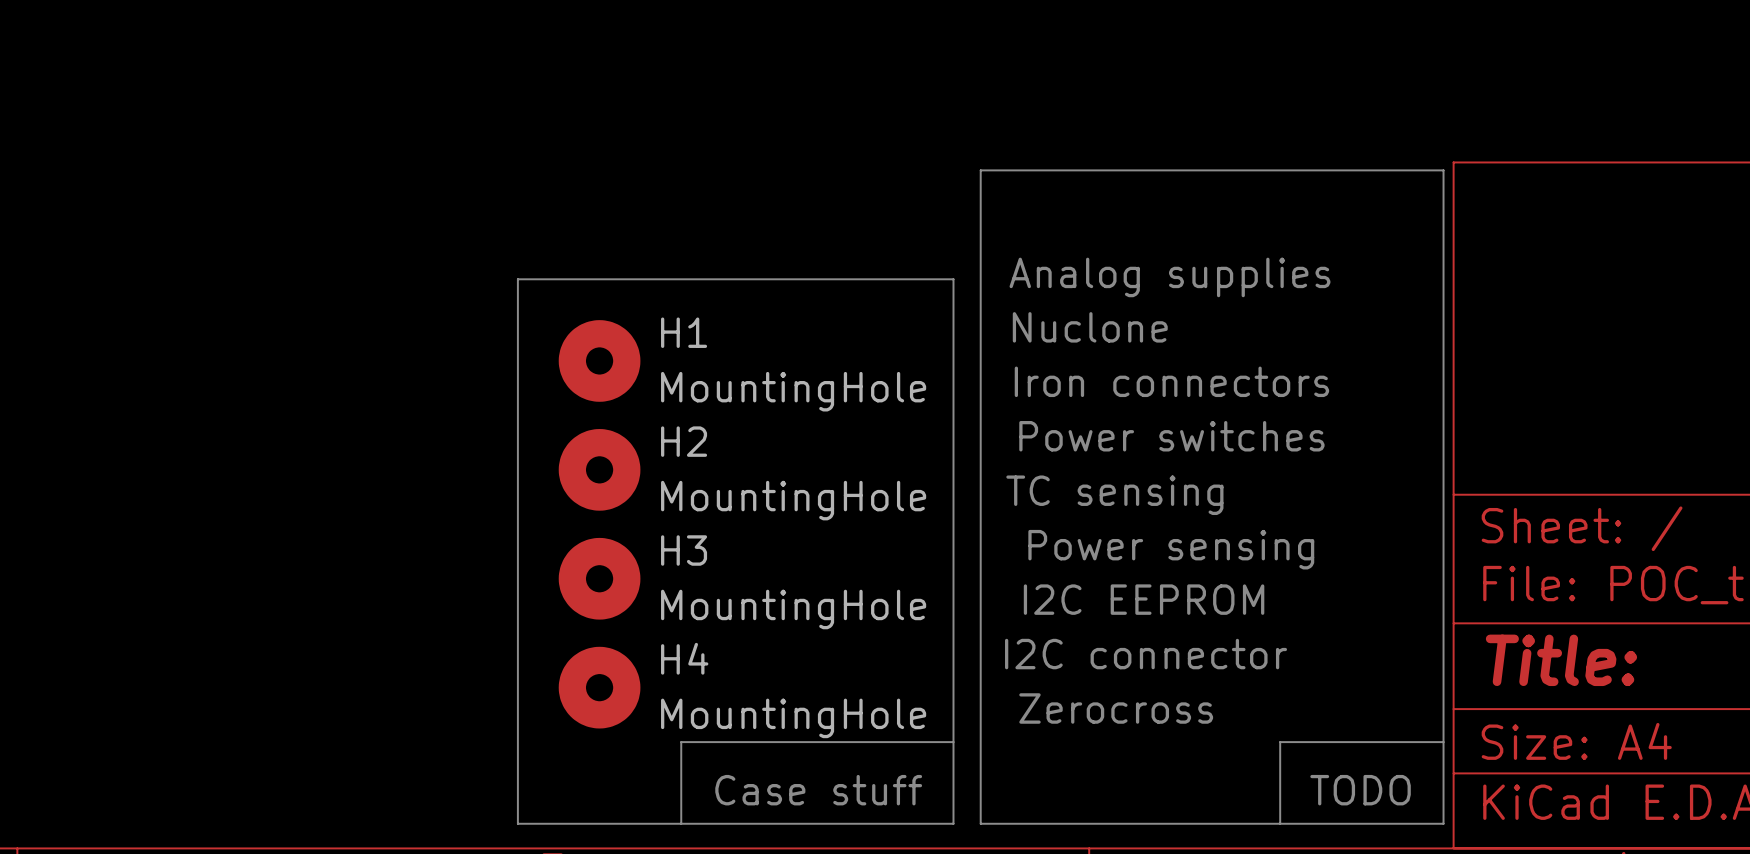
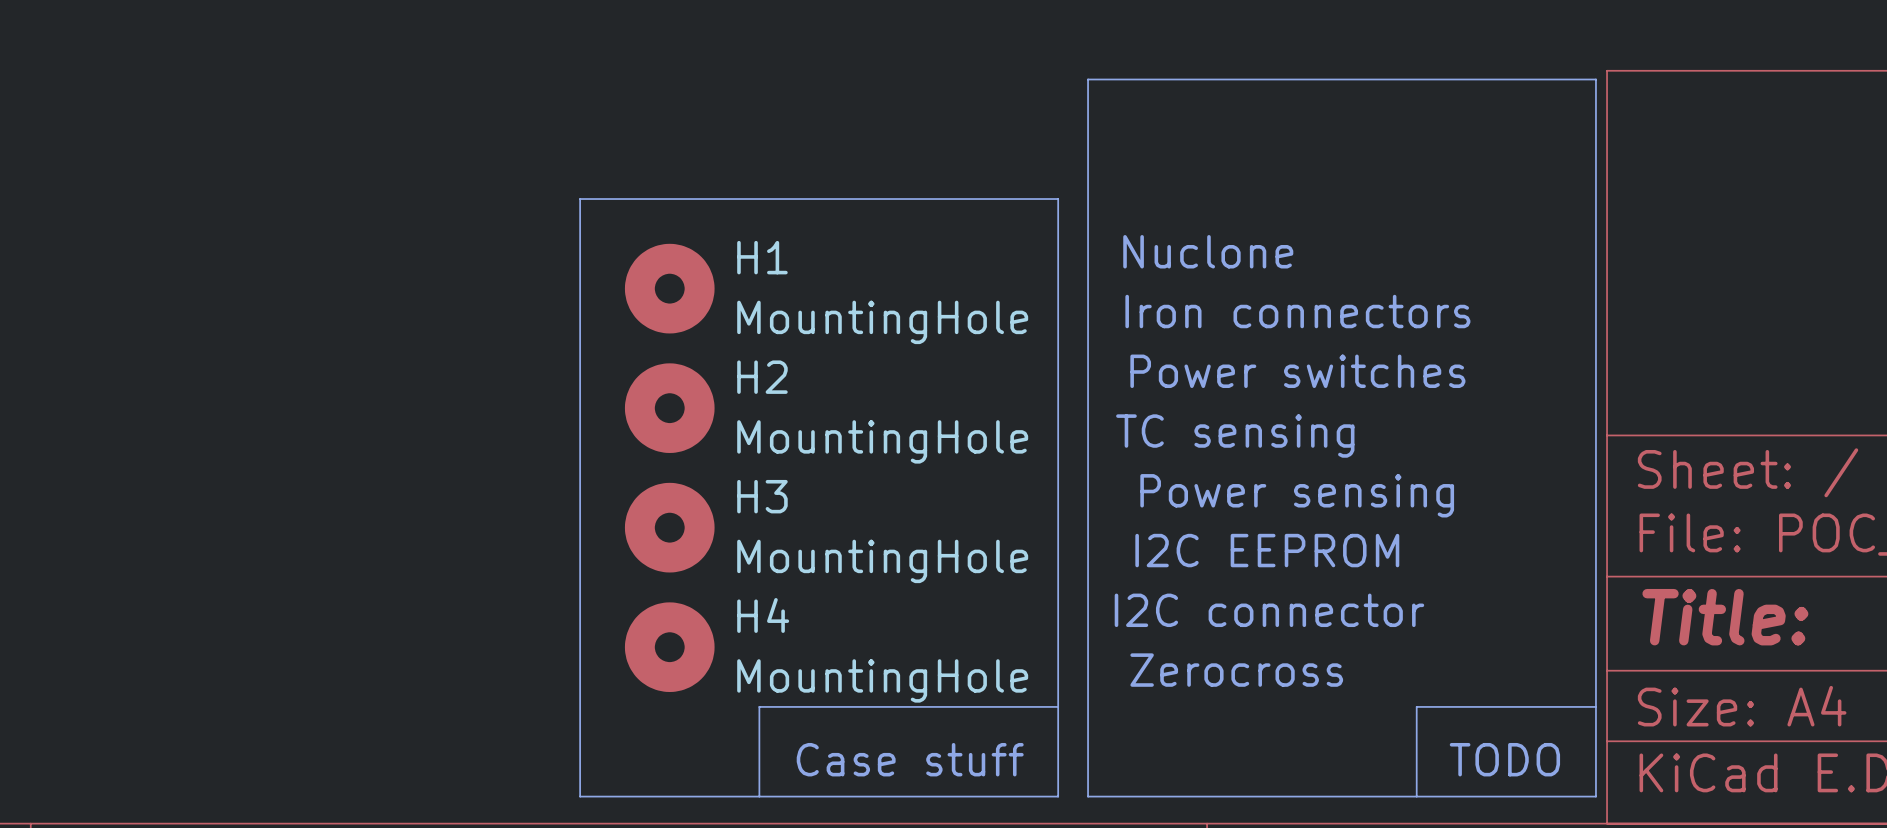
text: Analog supplies (1169, 277) -> none

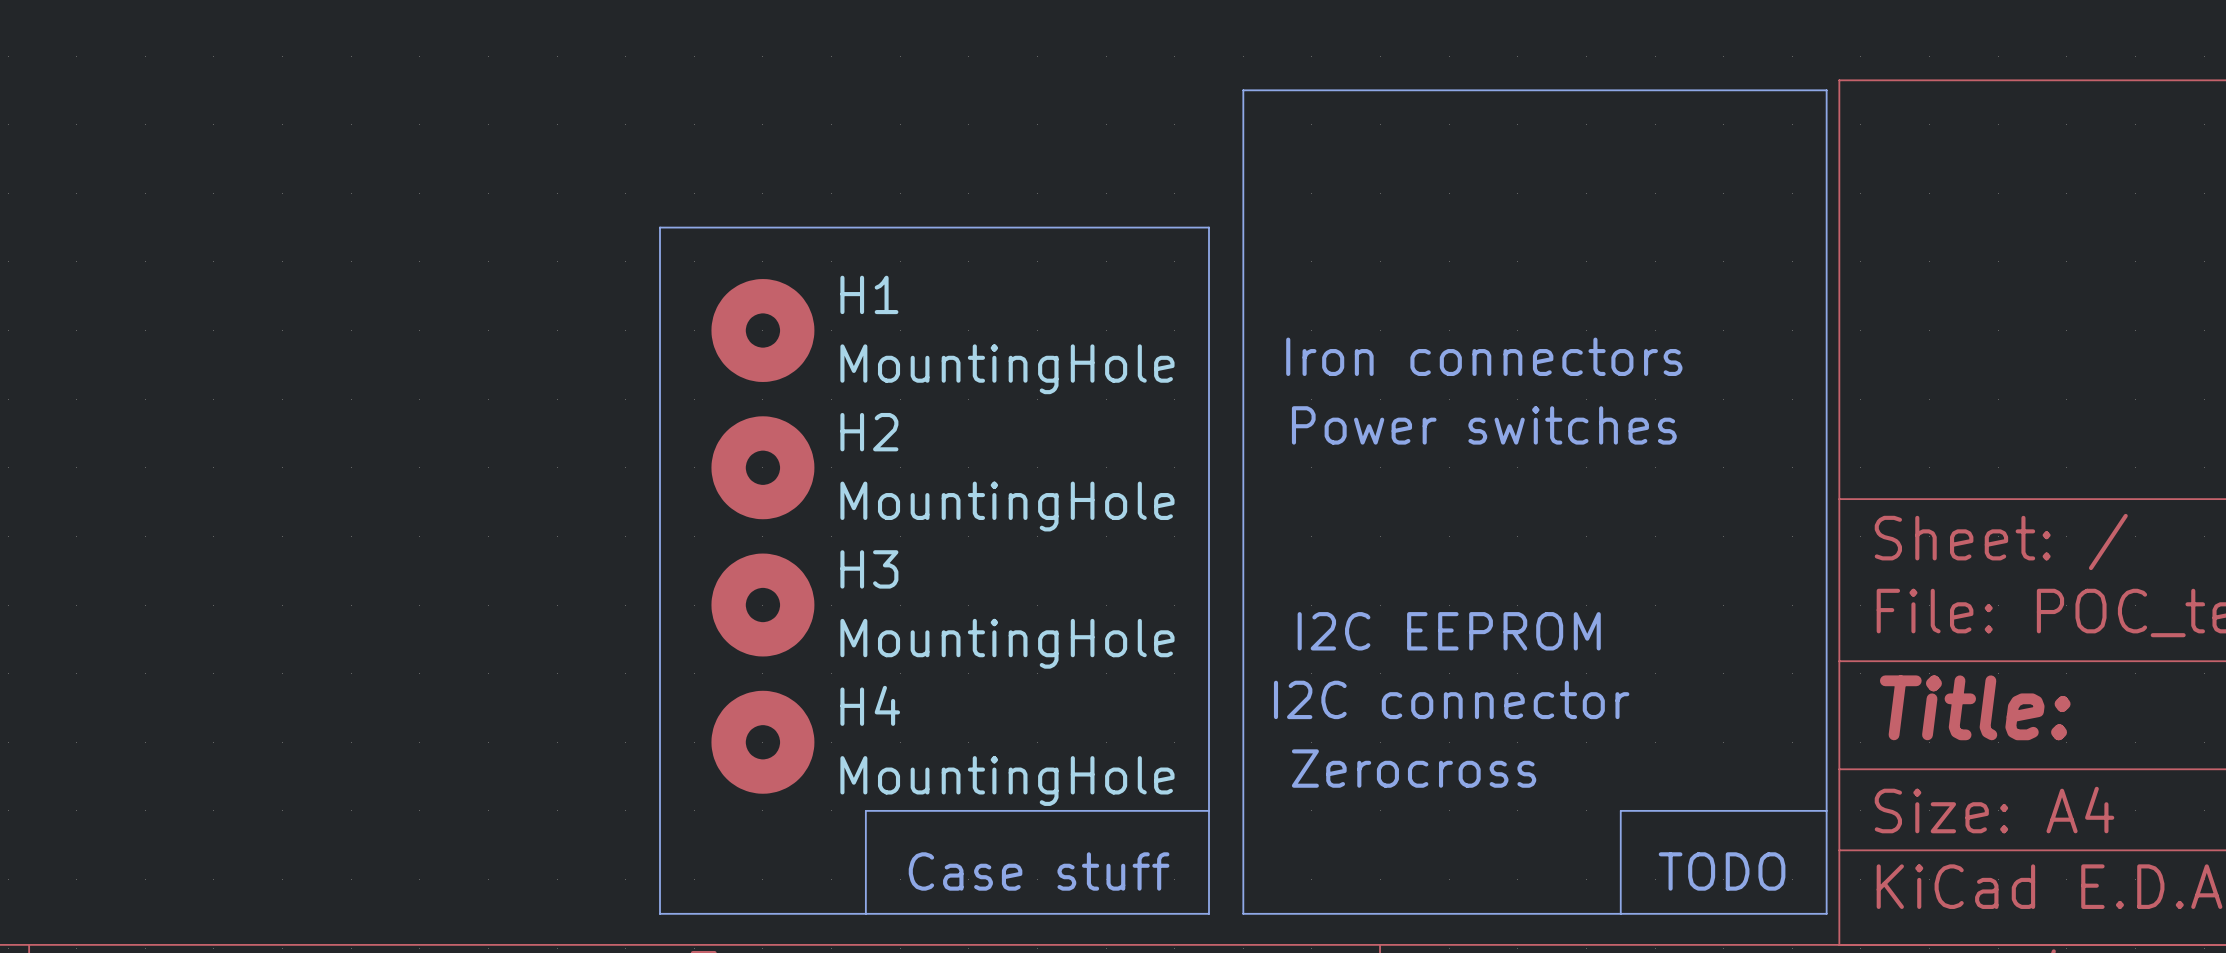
text: Nuclone (1208, 251) -> none
text: TC sensing (1235, 436) -> none
text: Power sensing (1297, 495) -> none

